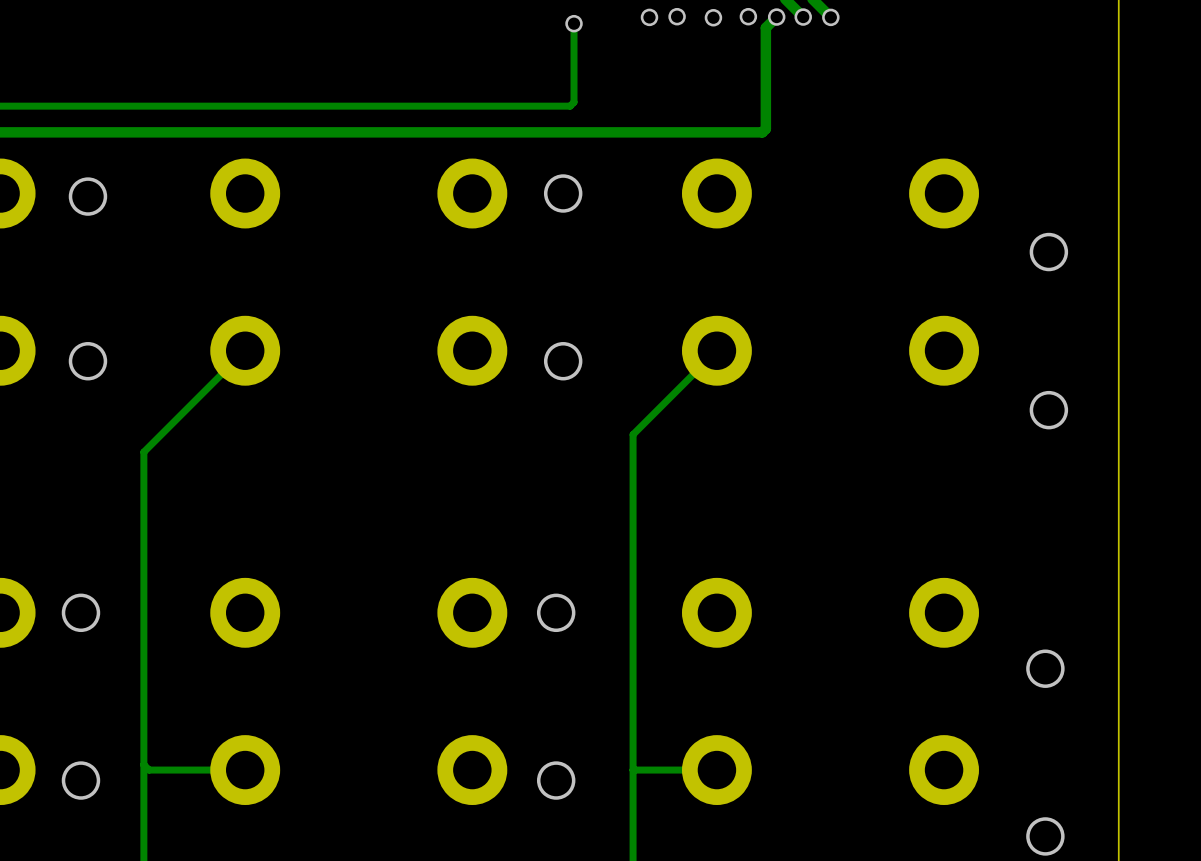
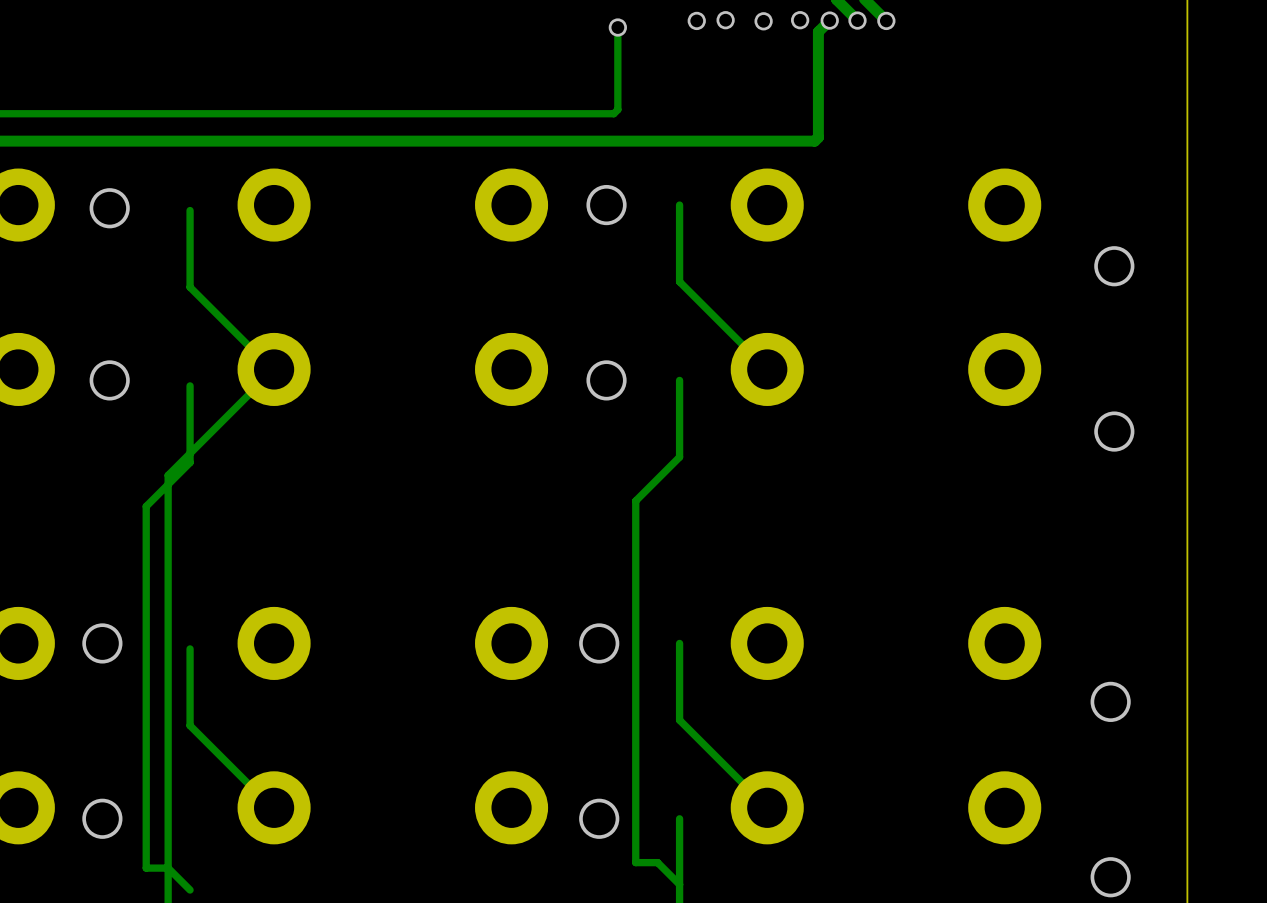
track: none -> (190, 210) (190, 287) (277, 374)
track: (716, 350) (633, 434) (633, 612) -> (767, 369) (679, 281) (679, 205)
track: none -> (679, 380) (679, 457) (635, 500) (635, 862) (657, 862) (679, 884)
track: none -> (190, 385) (190, 462) (146, 506) (146, 868) (168, 868) (190, 890)
track: none -> (190, 648) (190, 725) (277, 813)
track: (633, 686) (633, 780) -> none
track: (143, 764) (149, 770) (245, 770) -> none
track: (716, 770) (633, 770) -> (767, 807) (679, 720)

